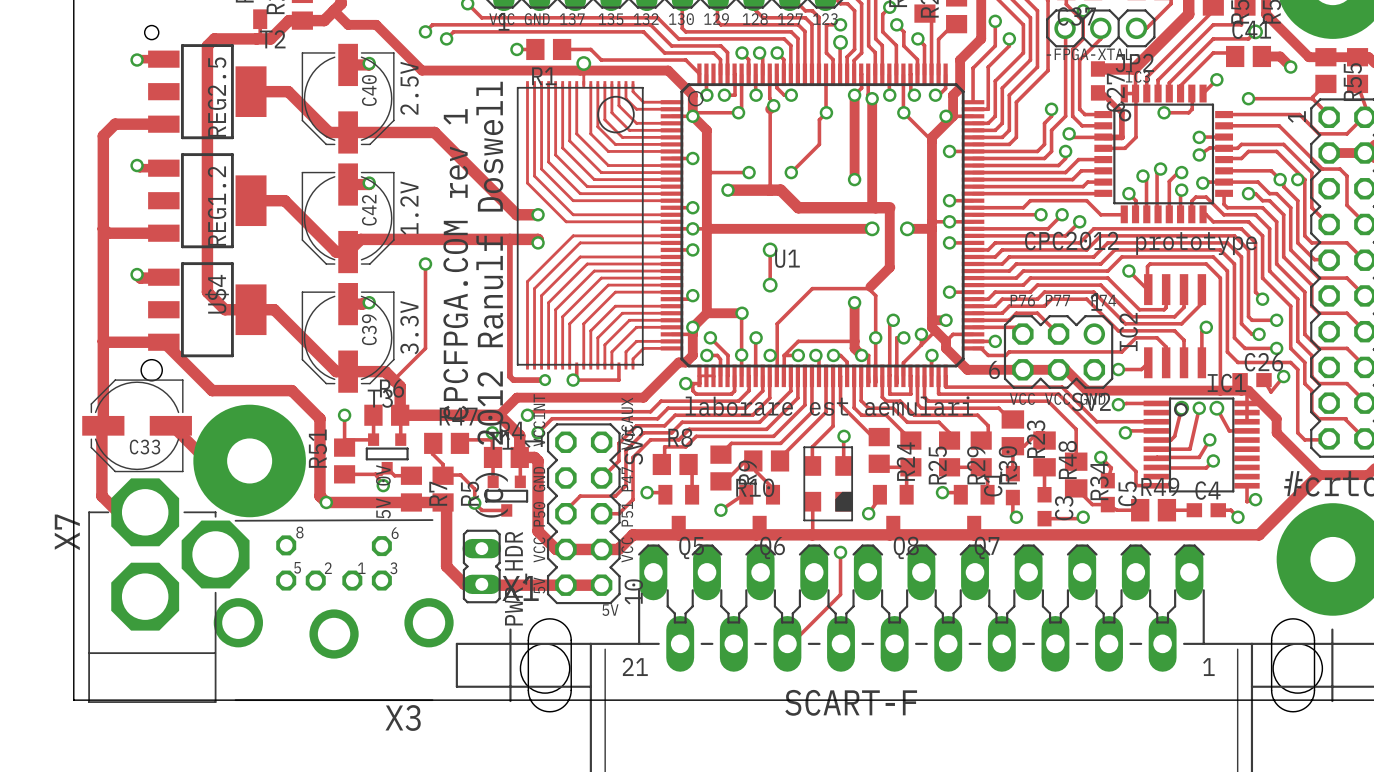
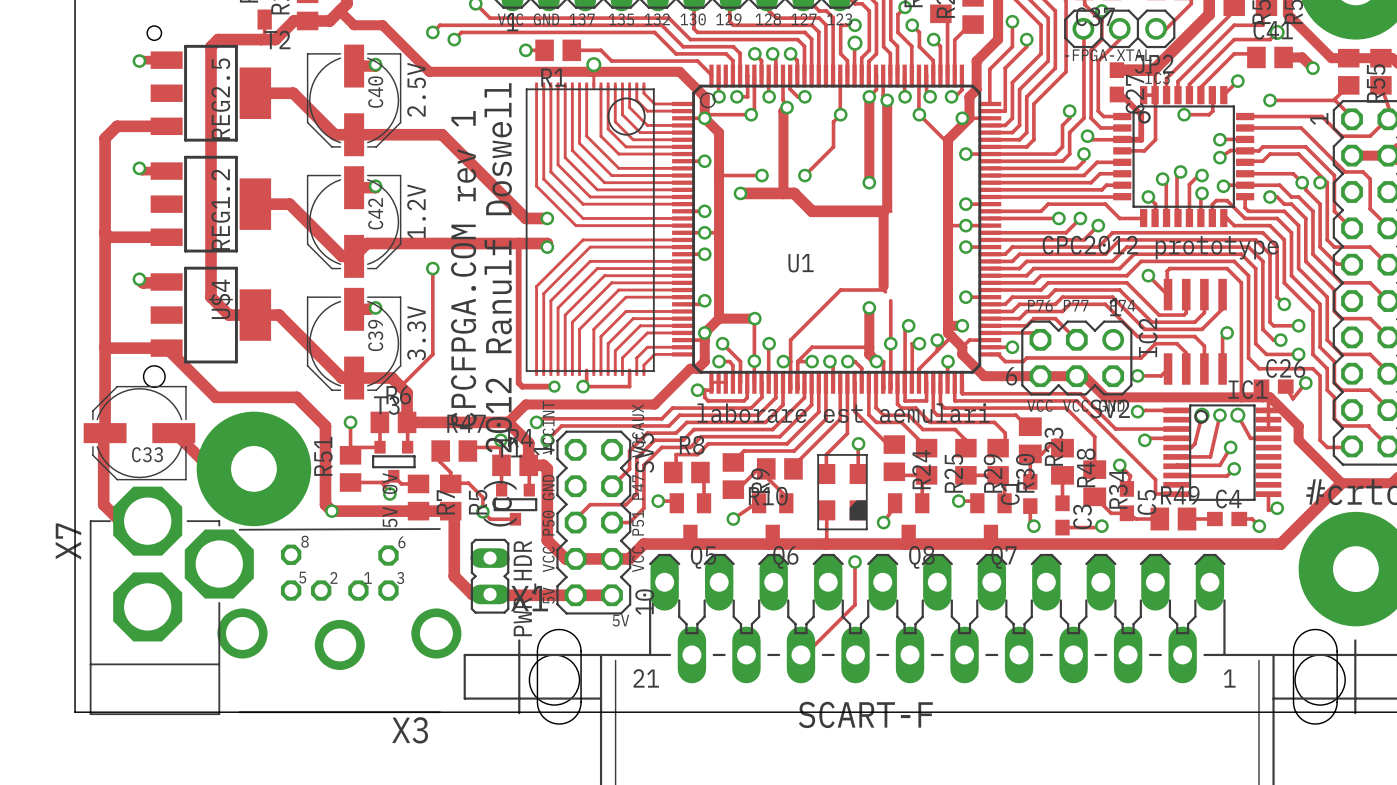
track width: thin (770, 109) (770, 190) -> thick (783, 111) (783, 193)
track: (868, 207) (889, 207) (889, 267) (870, 286) (870, 290) -> none
track: (706, 228) (872, 228) -> none
via: (872, 228) -> none
track: (907, 228) (931, 228) -> none
via: (907, 228) -> none
track: (770, 249) (770, 285) -> none
via: (770, 249) -> none
via: (770, 285) -> none
track: (875, 295) (868, 288) (812, 288) (777, 323) (777, 334) -> (887, 207) (883, 211) (883, 290) (840, 290) (790, 340)

